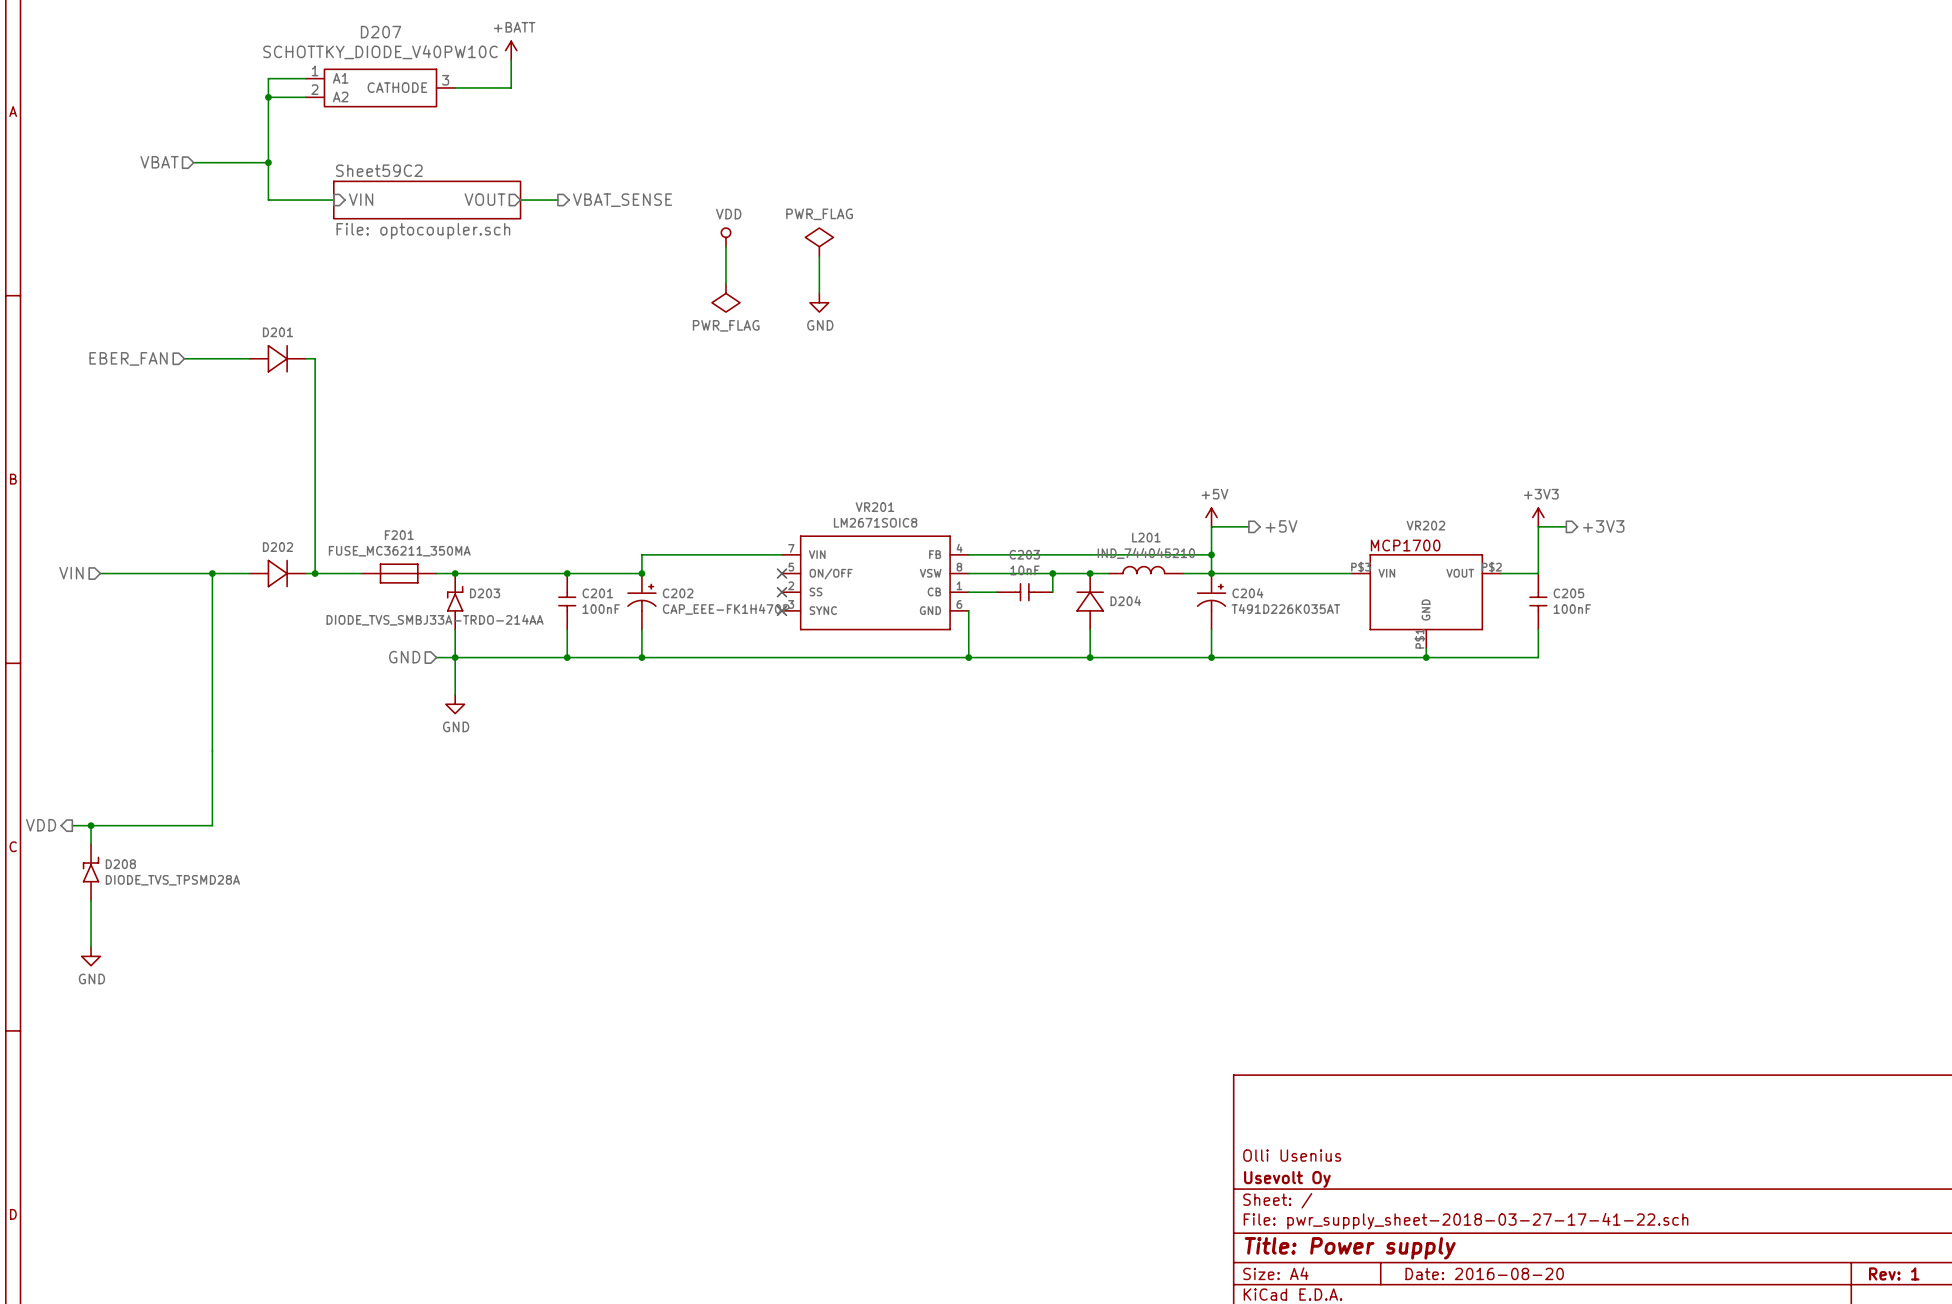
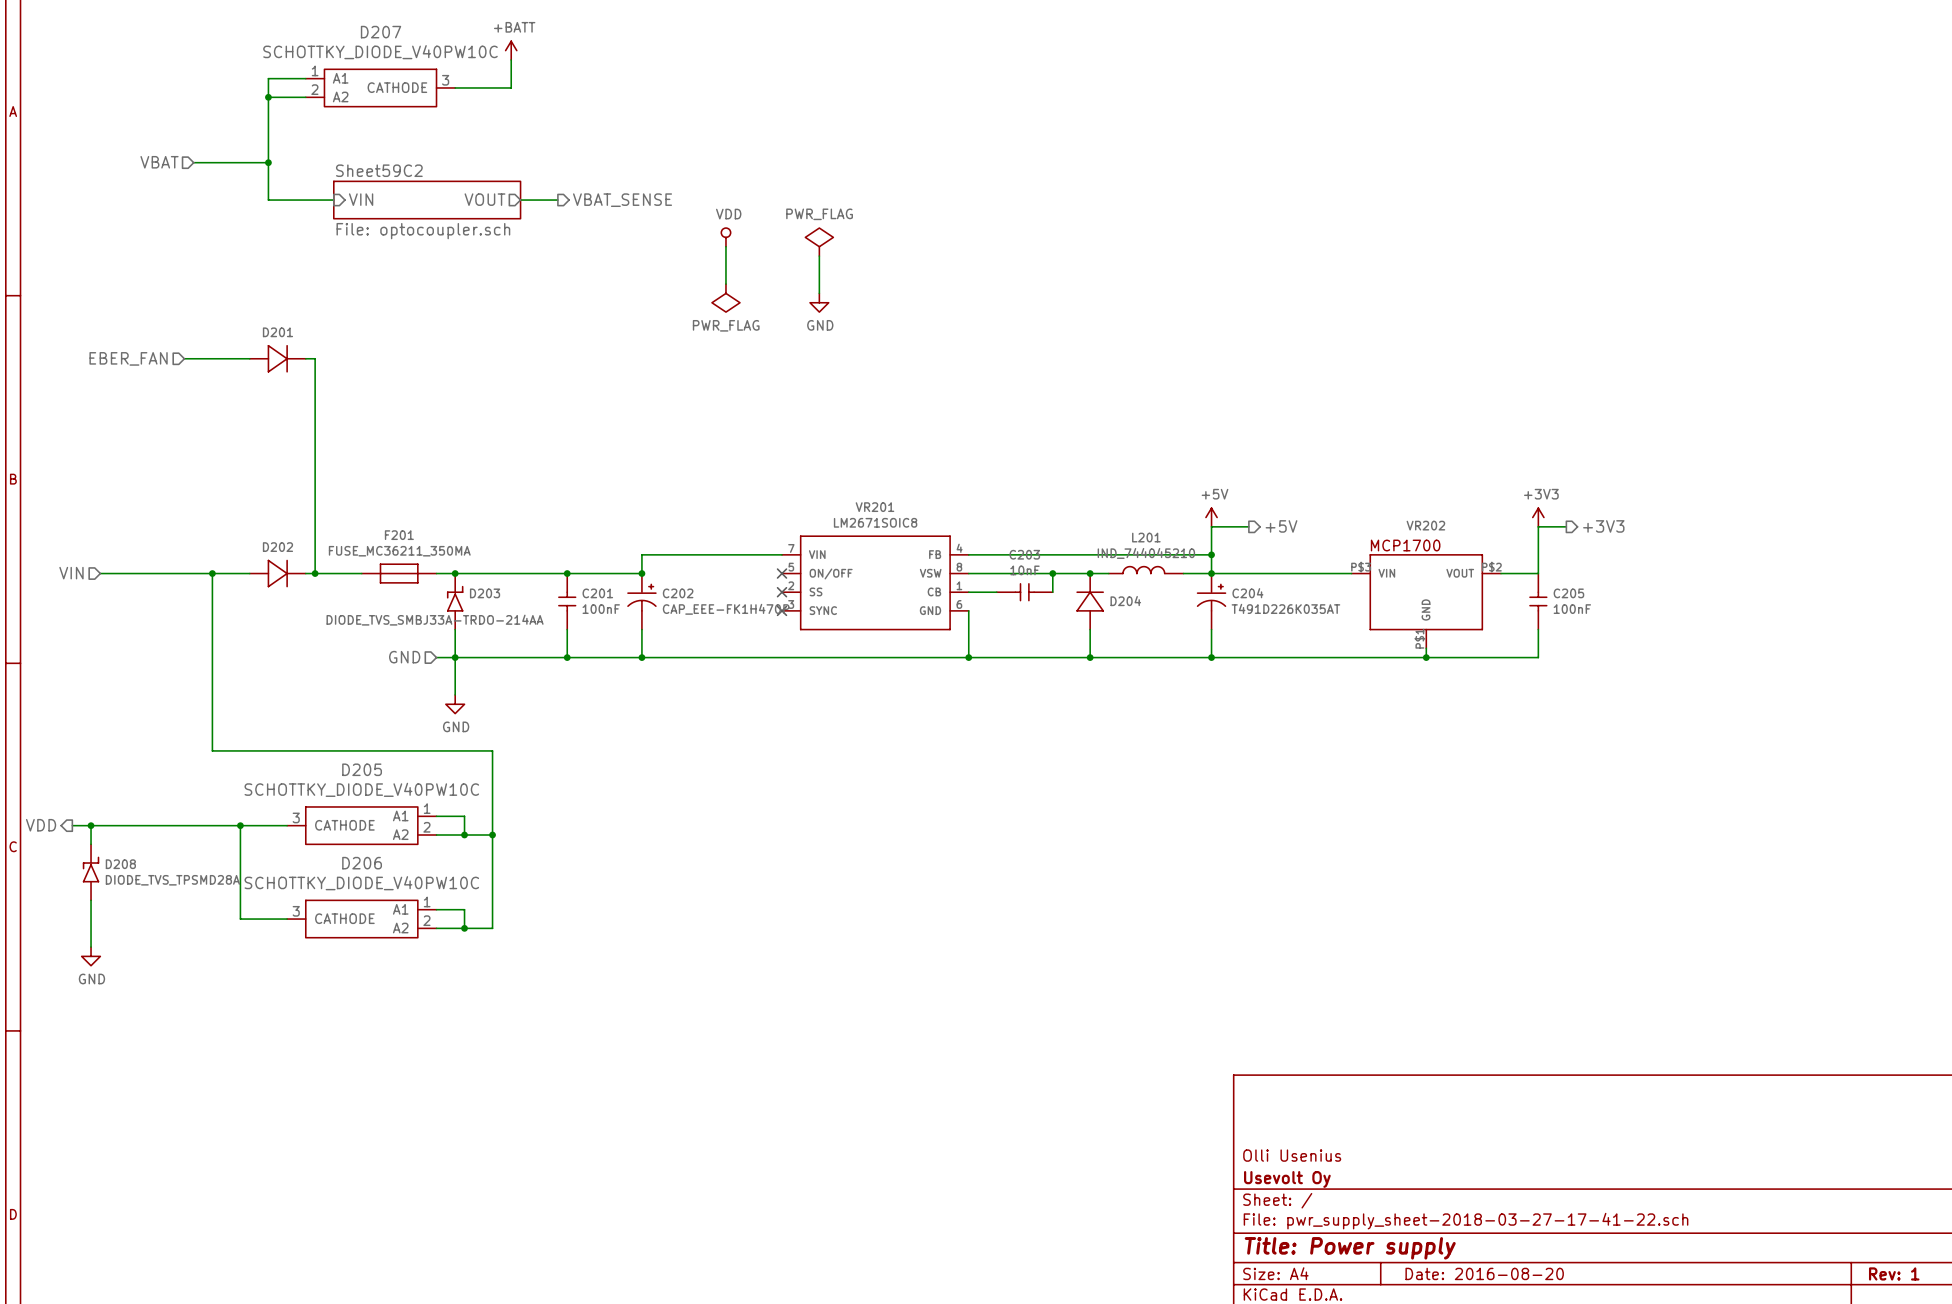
wire: (212, 750) (212, 825) -> (287, 825) (212, 825)
wire: none -> (212, 750) (492, 750) (492, 928) (436, 928)
wire: none -> (436, 816) (464, 816) (464, 834)
wire: none -> (240, 825) (240, 919) (287, 919)
junction: none -> (240, 825)
D205: none -> SCHOTTKY_DIODE_V40PW10C (361, 825)
wire: none -> (436, 834) (492, 834)
junction: none -> (464, 834)
junction: none -> (492, 834)
wire: none -> (436, 909) (464, 909) (464, 928)
D206: none -> SCHOTTKY_DIODE_V40PW10C (361, 919)
junction: none -> (464, 928)

